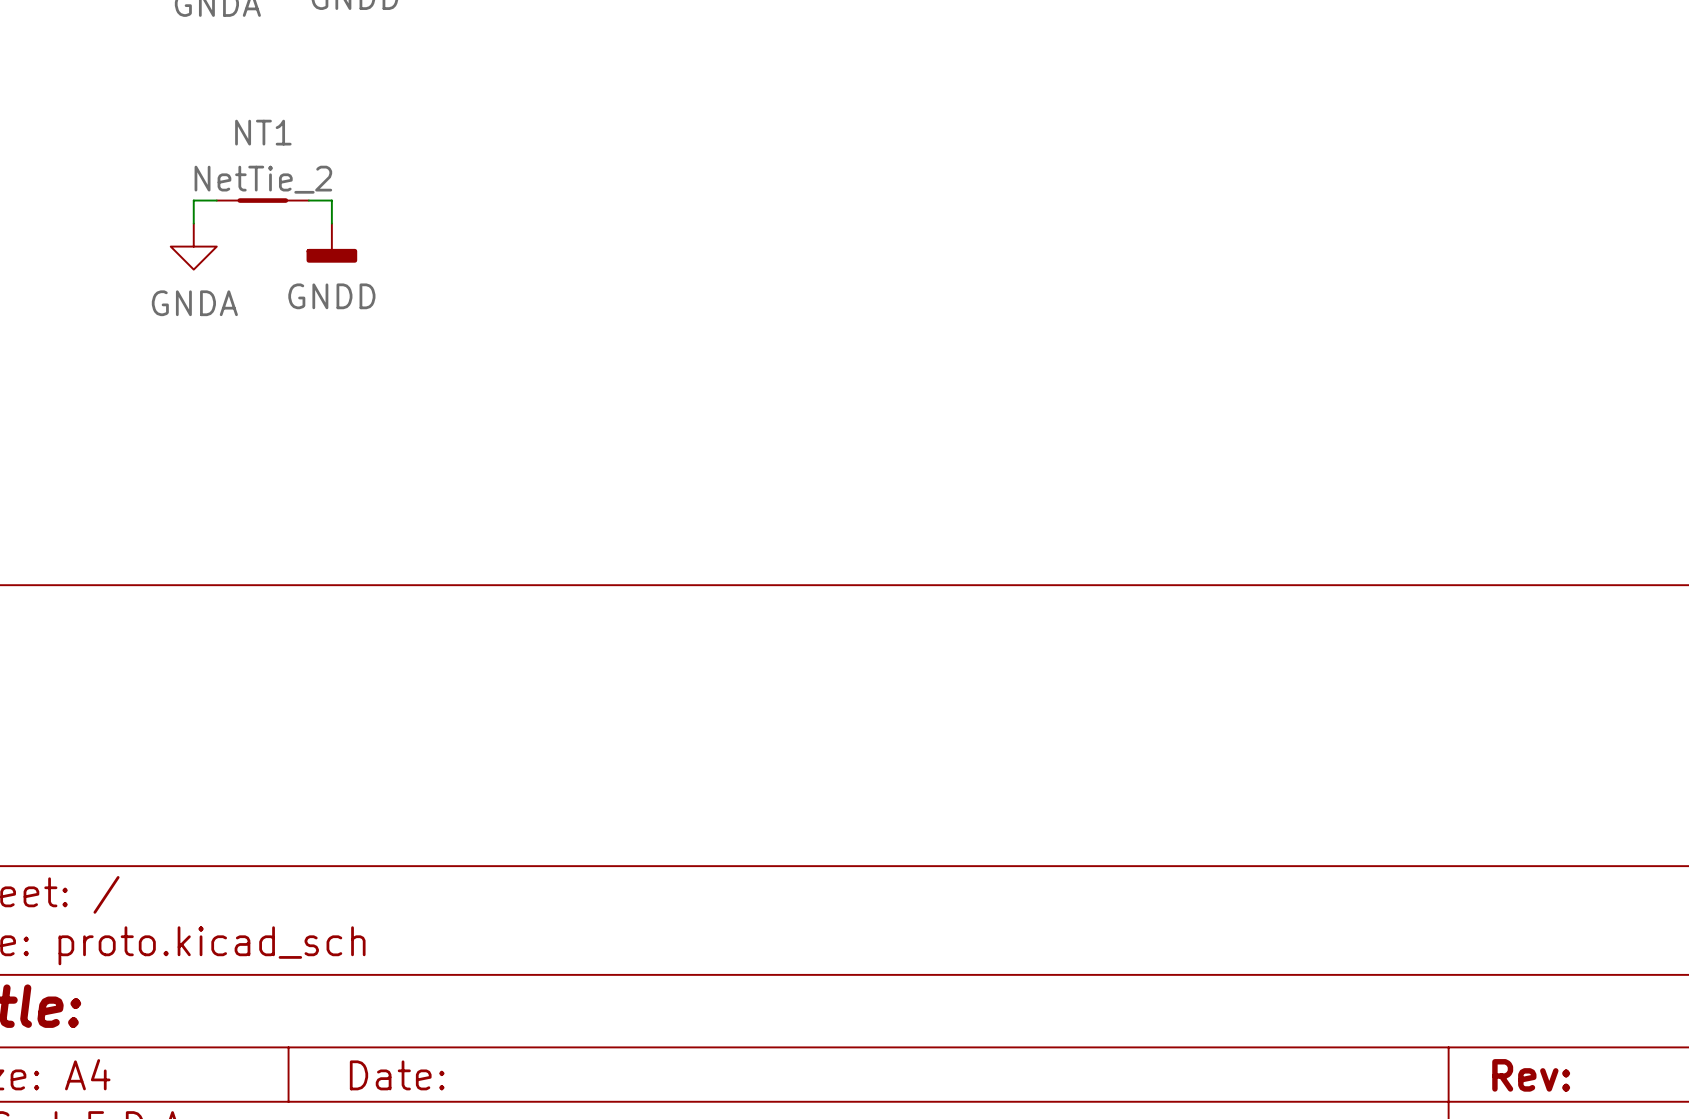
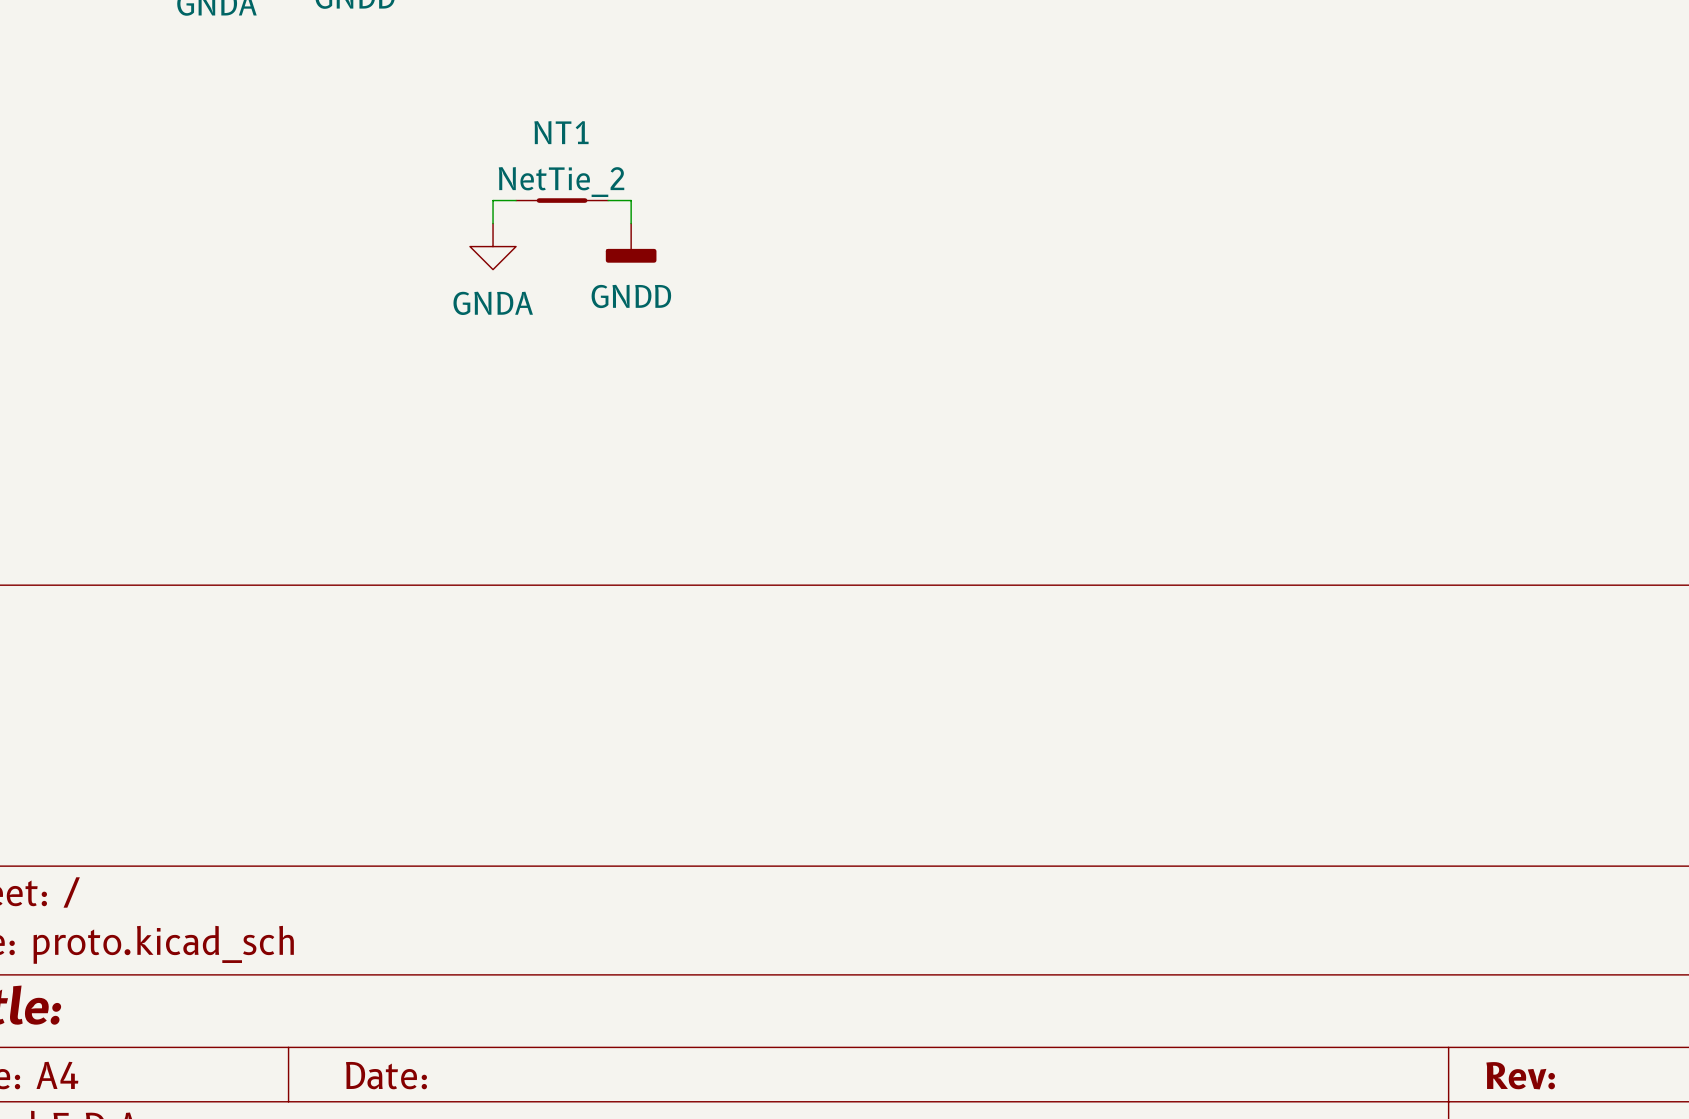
wire: (216, 200) (193, 200) (193, 223) -> (516, 200) (493, 200) (493, 223)
NT1 position: (262, 200) -> (562, 200)
wire: (308, 200) (331, 200) (331, 223) -> (608, 200) (631, 200) (631, 223)
power symbol position: GNDD (331, 243) -> GNDD (631, 243)
power symbol position: GNDA (193, 246) -> GNDA (493, 246)

